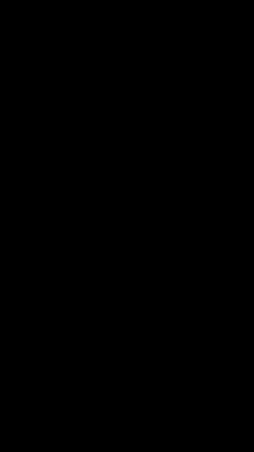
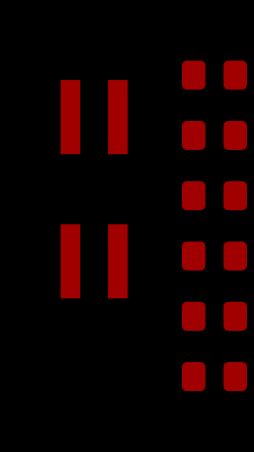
part: none -> (214, 75)
part: none -> (94, 117)
part: none -> (214, 135)
part: none -> (214, 195)
part: none -> (214, 256)
part: none -> (94, 261)
part: none -> (214, 316)
part: none -> (214, 376)

